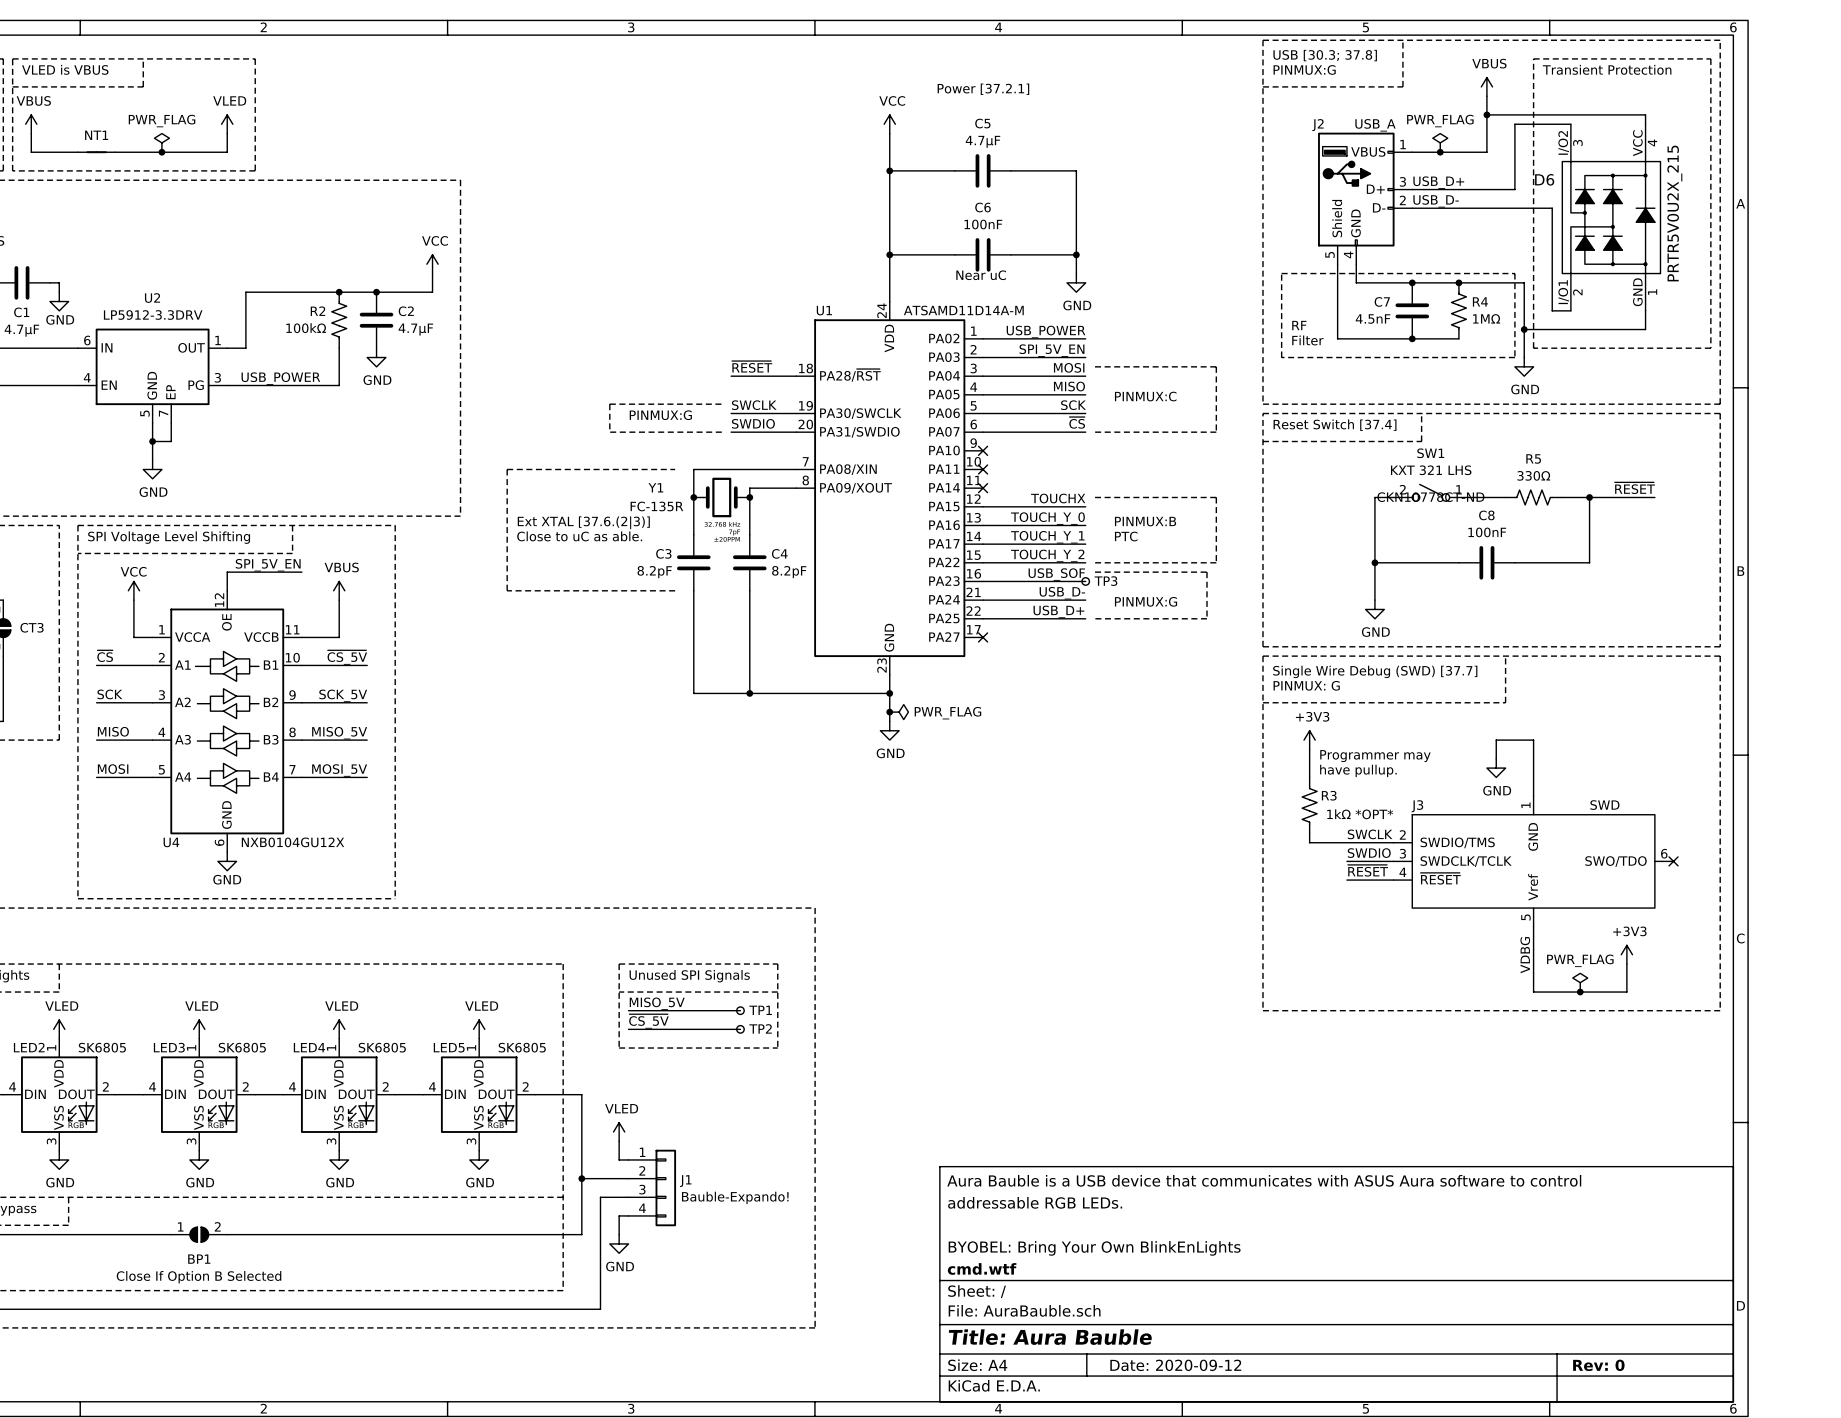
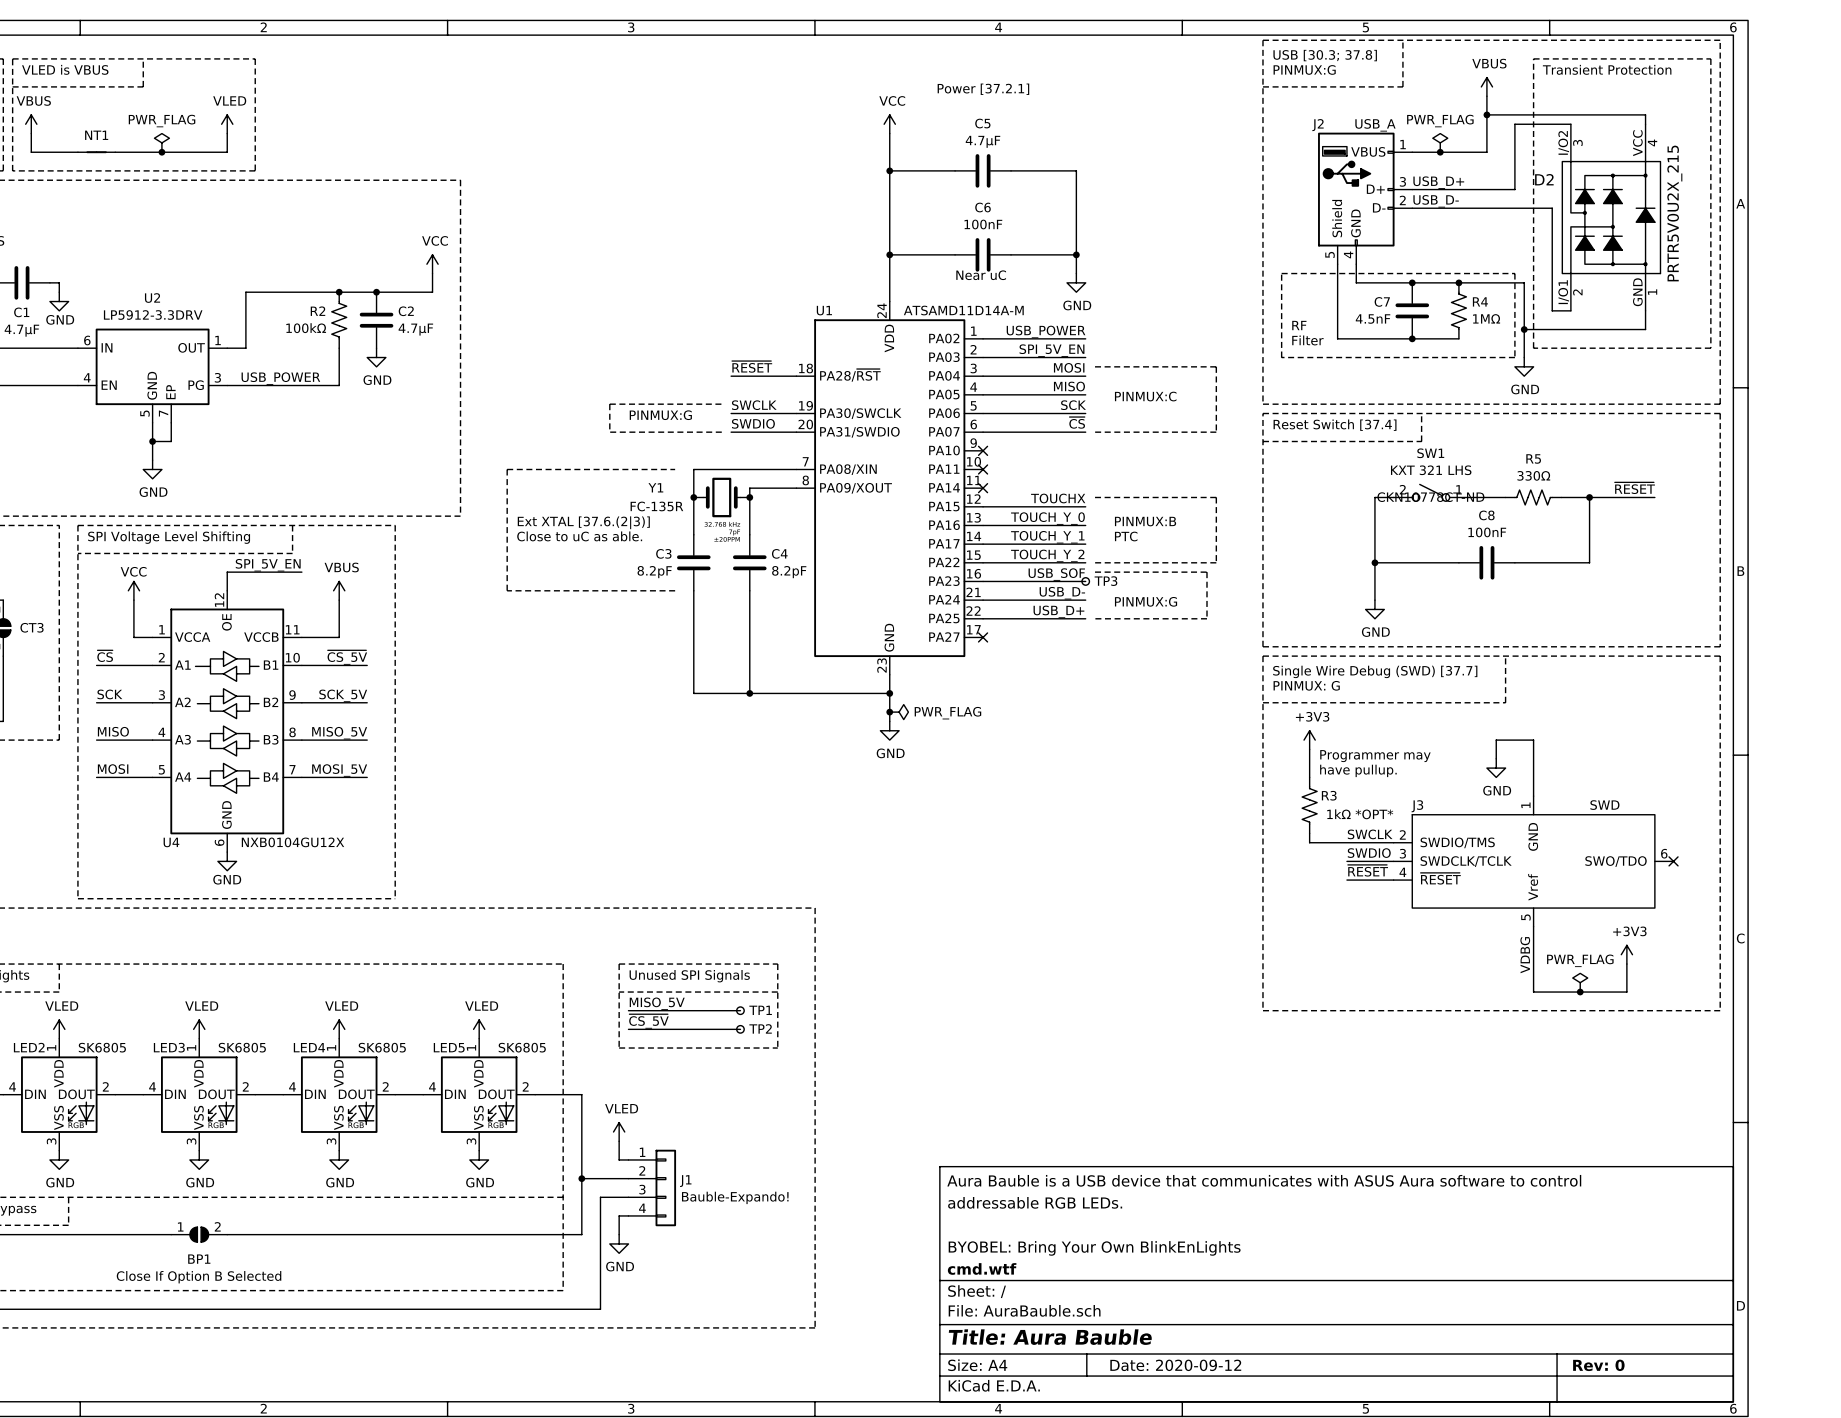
D6 name: D6 (1544, 179) -> D2 (1544, 179)

